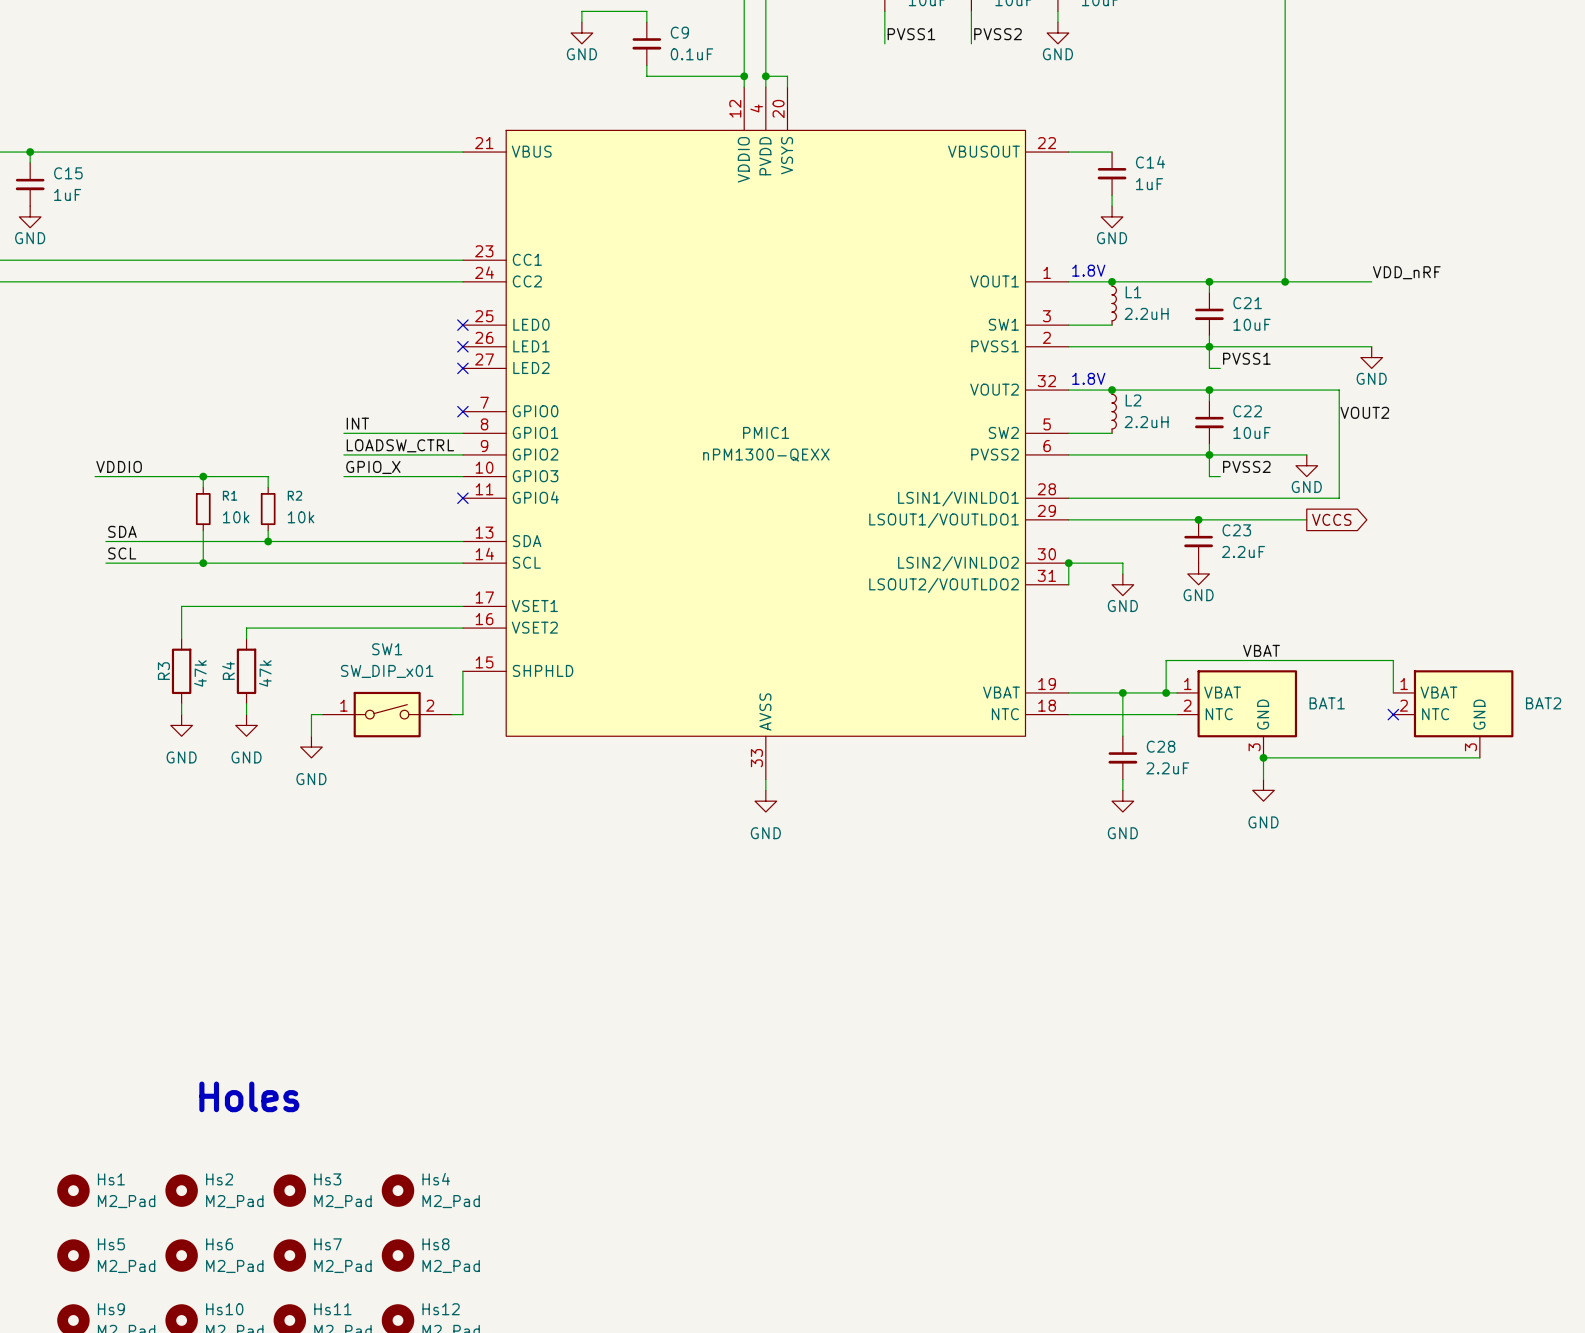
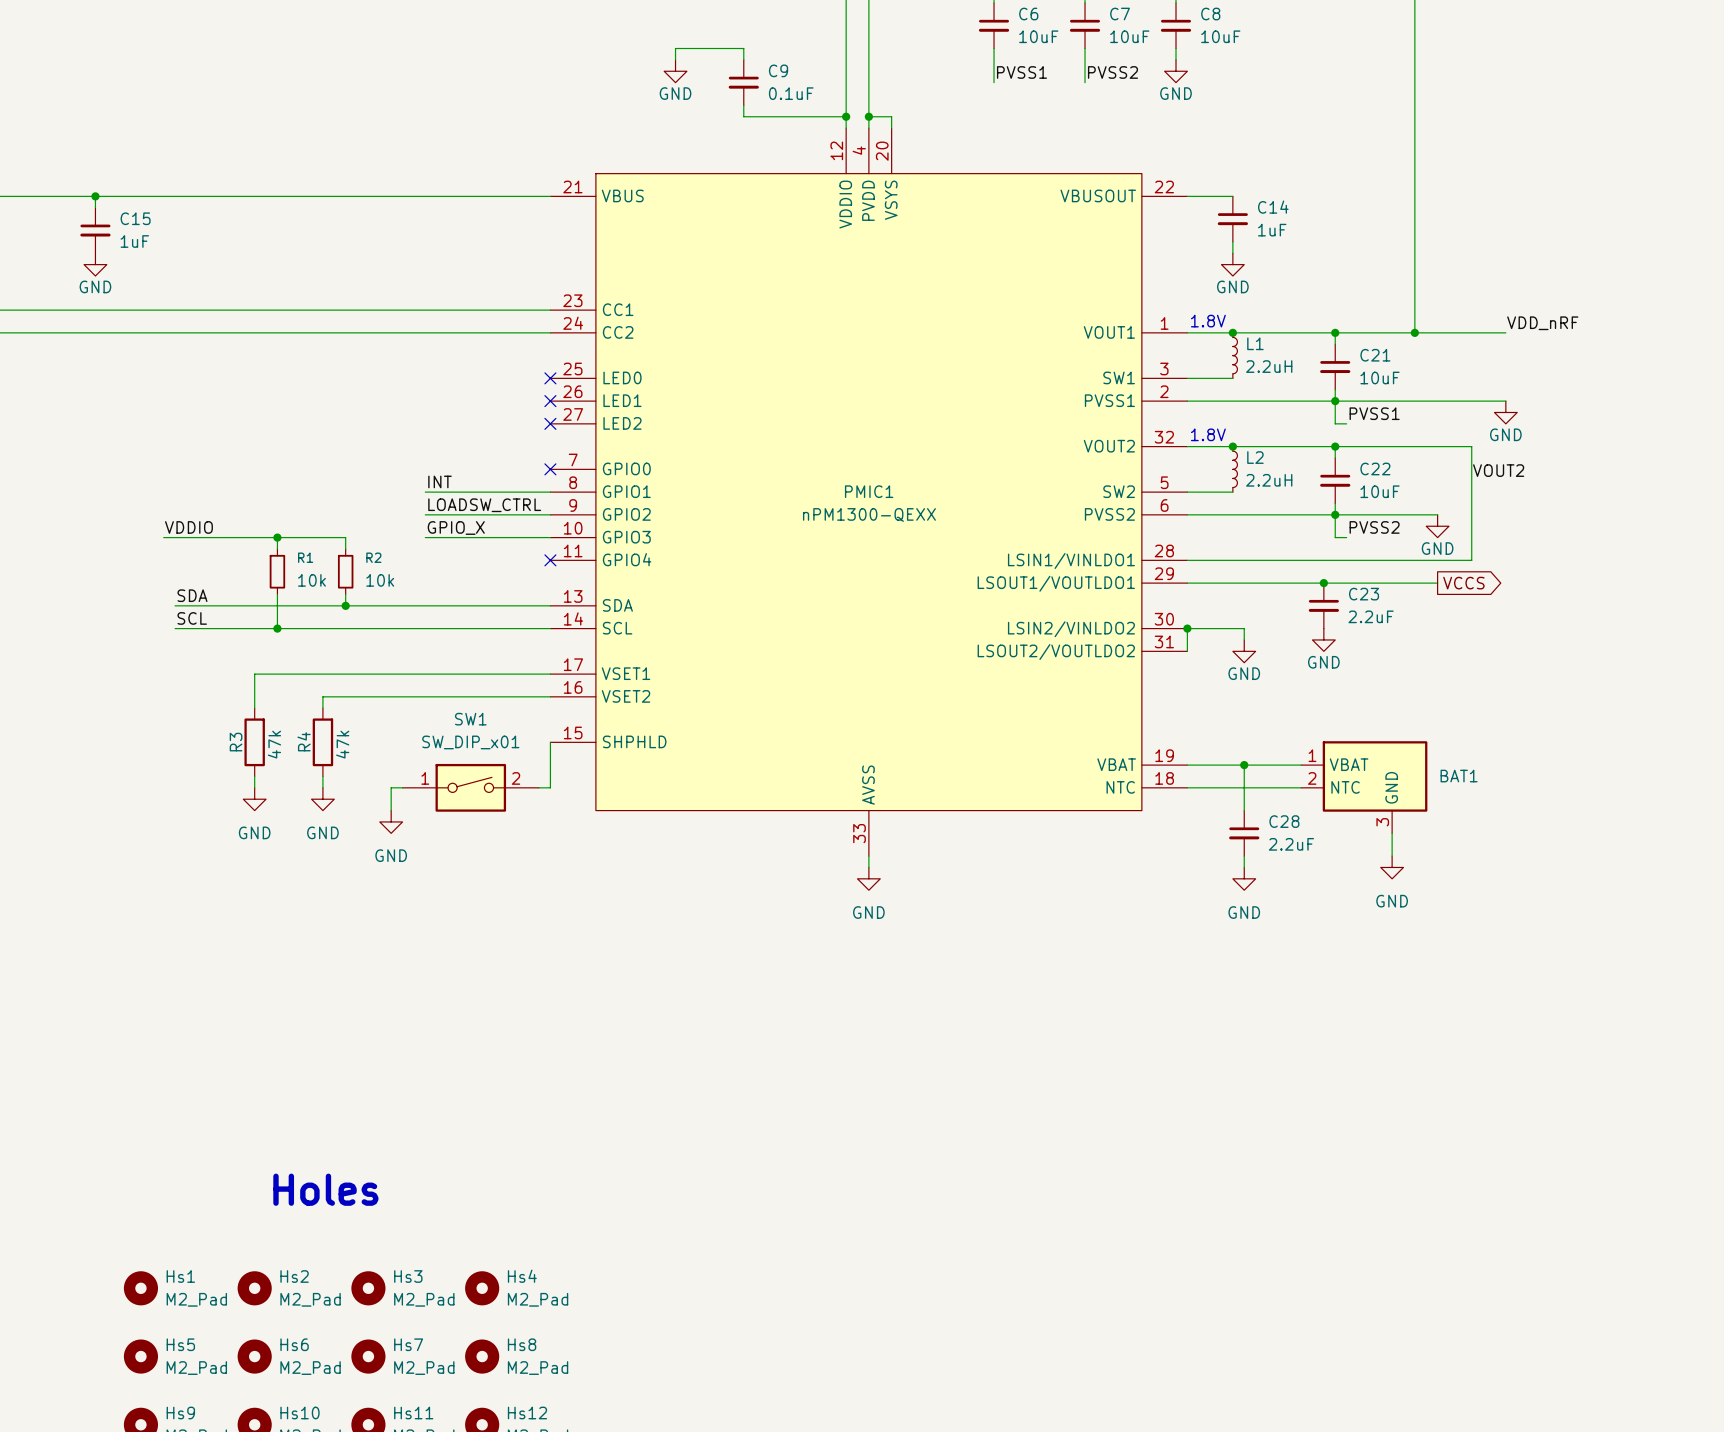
label: VBAT (1261, 650) -> none
wire: (1166, 692) (1166, 660) (1393, 660) (1393, 692) -> none
junction: (1166, 692) -> none
no-connect mark: (1393, 714) -> none
BAT2: (1453, 714) -> none
wire: (1263, 757) (1479, 757) -> none
junction: (1263, 757) -> none

